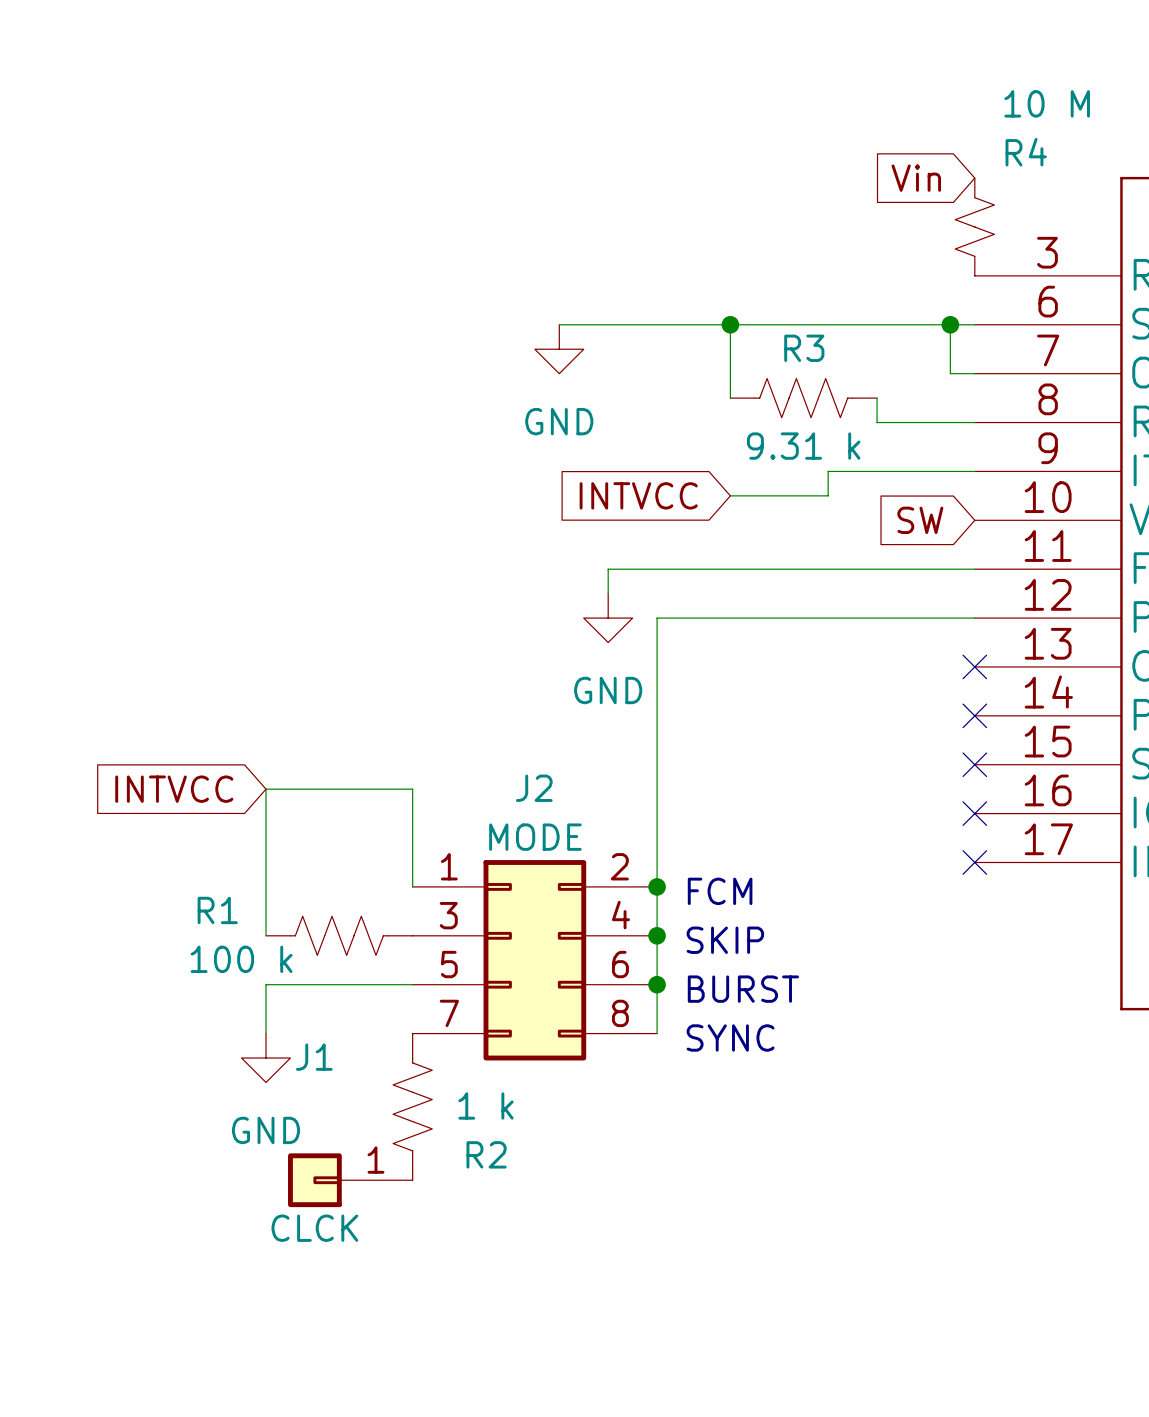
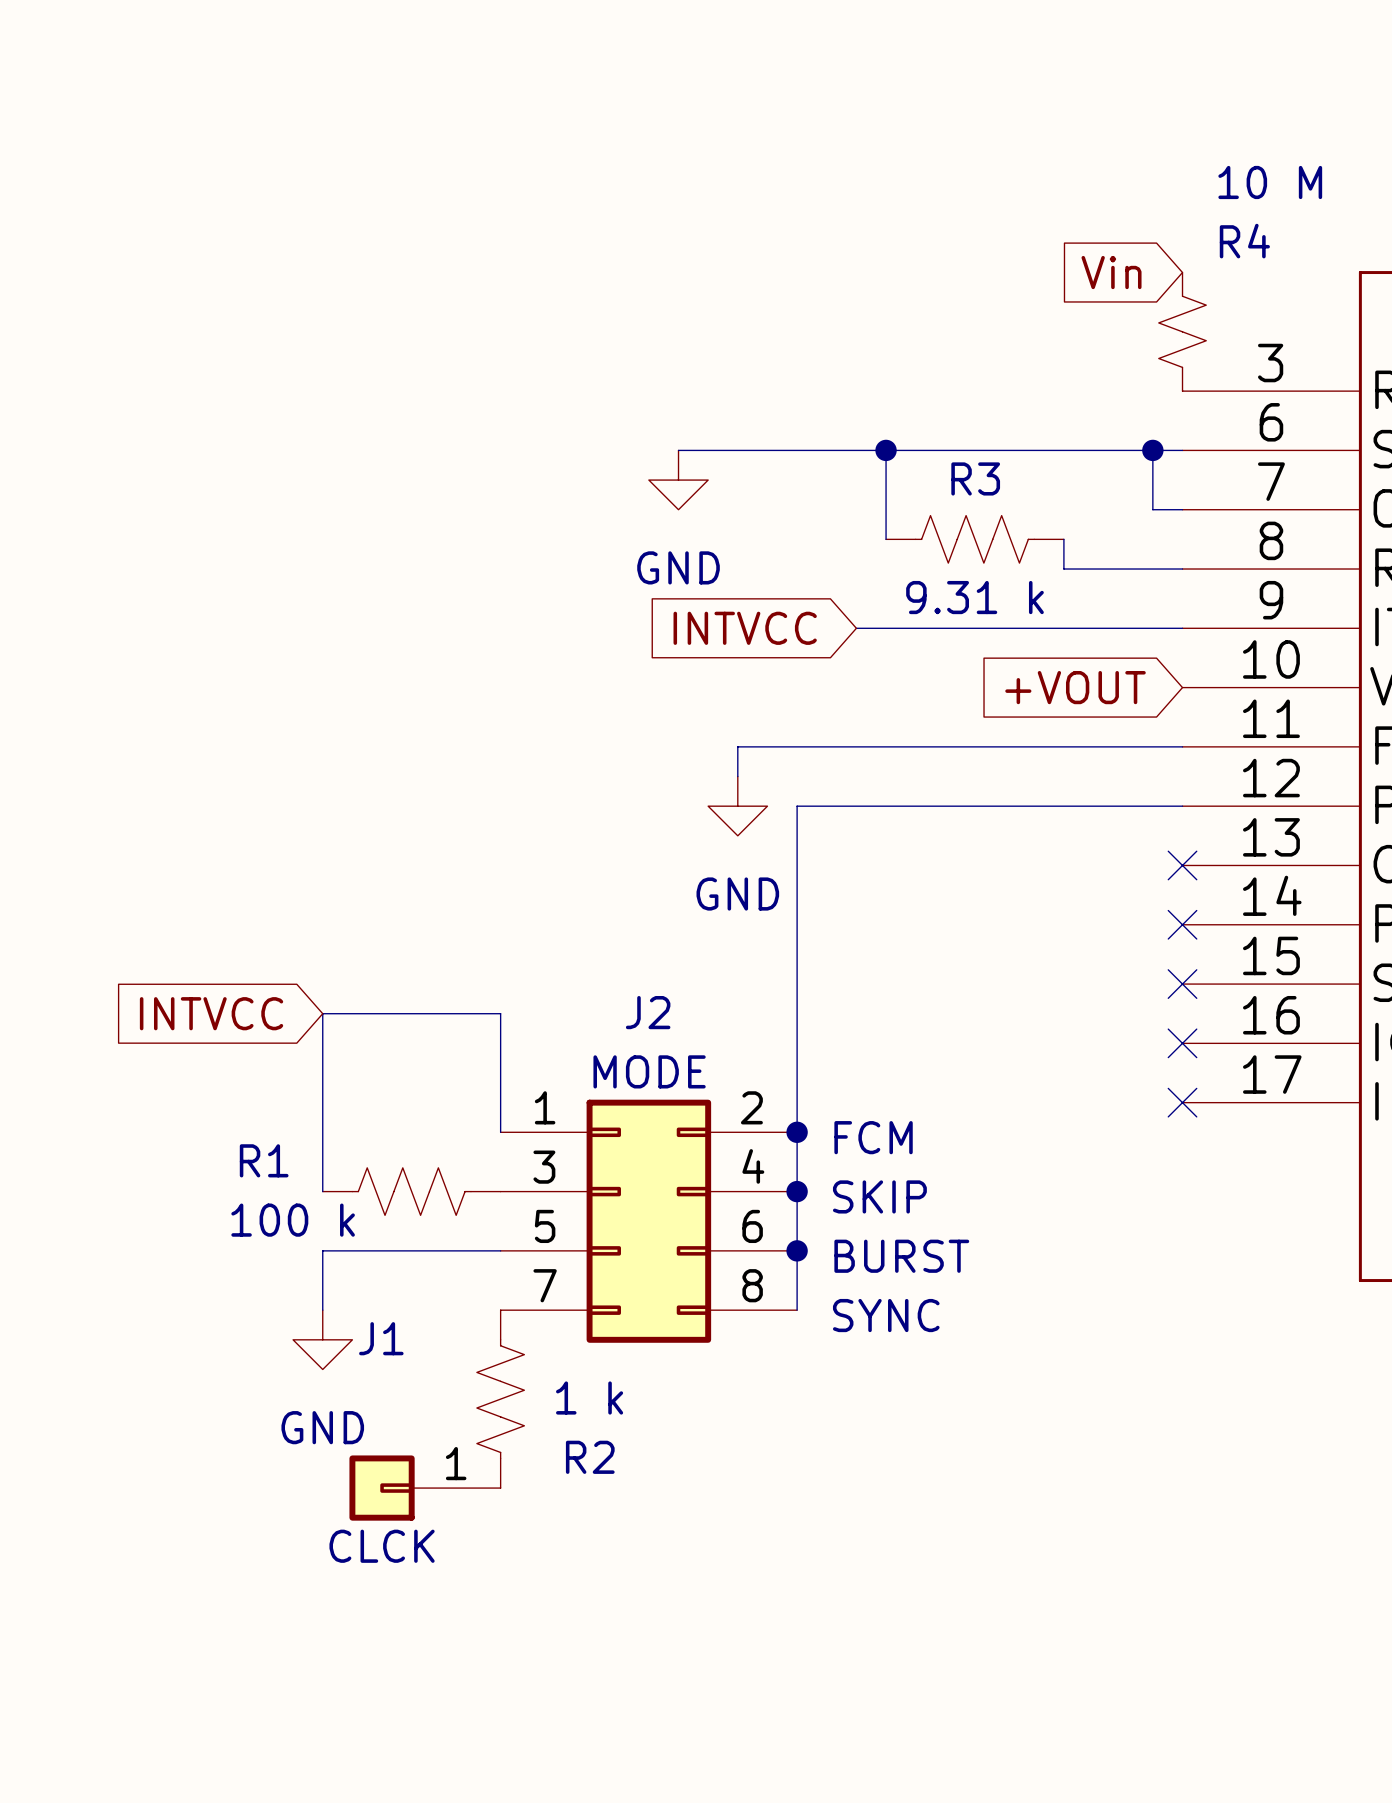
wire: (828, 471) (828, 495) (730, 495) -> (1004, 628) (856, 628)
global label position: INTVCC (638, 495) -> INTVCC (745, 628)
global label: SW (920, 520) -> +VOUT (1075, 687)

